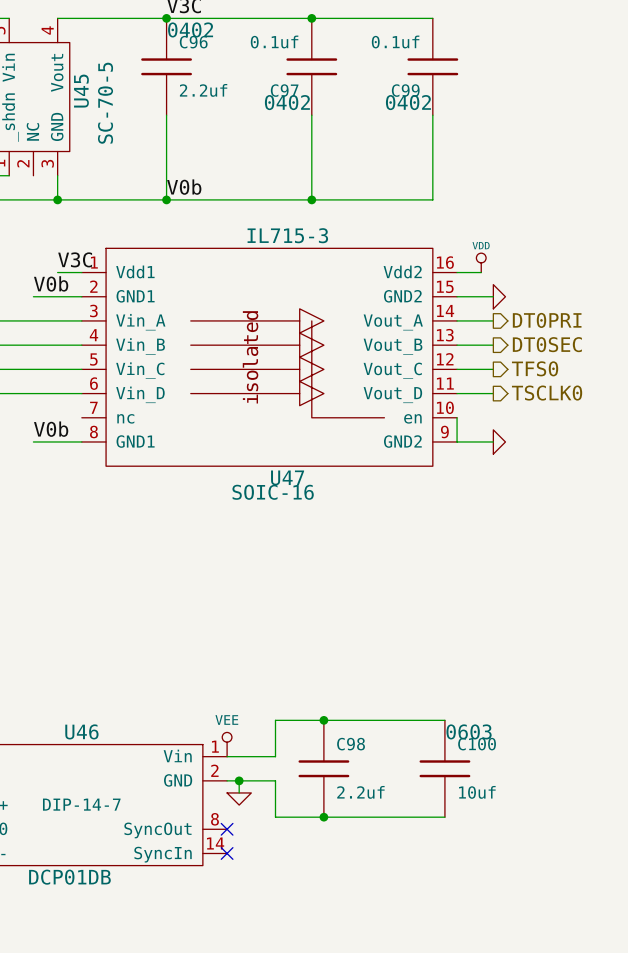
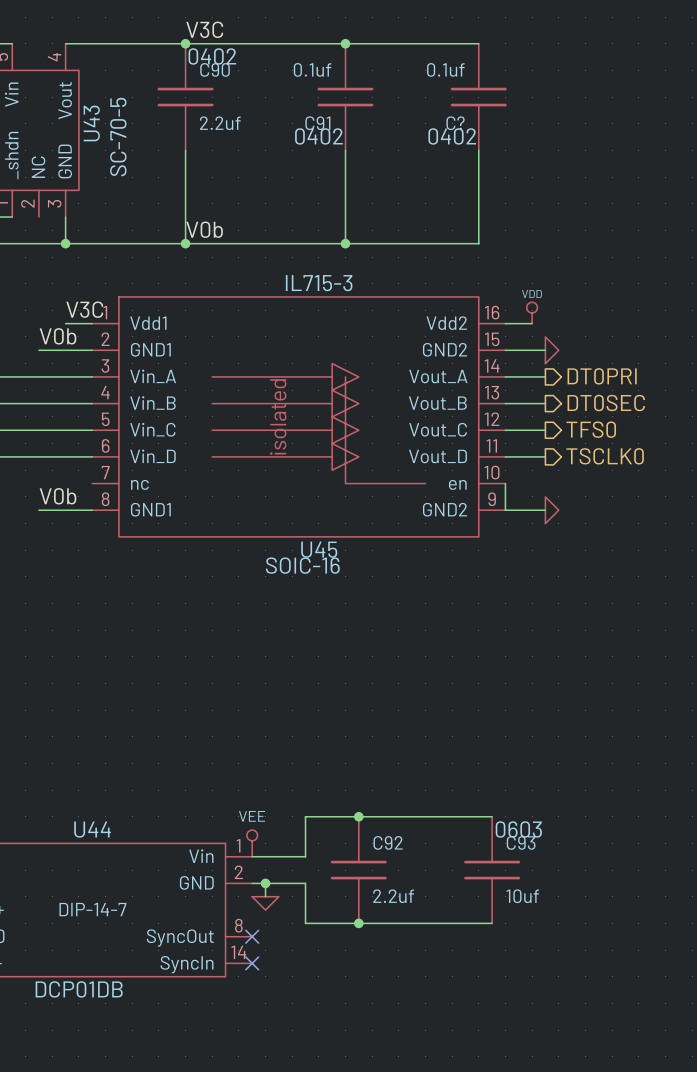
C96 name: C96 (193, 42) -> C90 (215, 69)
C97 name: C97 (284, 90) -> C91 (317, 123)
C99 name: C99 (405, 90) -> C? (455, 123)
U45 name: U45 (81, 91) -> U43 (91, 123)
U47 name: U47 (287, 477) -> U45 (319, 549)
U46 name: U46 (81, 731) -> U44 (92, 829)
C98 name: C98 (351, 744) -> C92 (388, 842)
C100 name: C100 (477, 744) -> C93 (521, 842)

